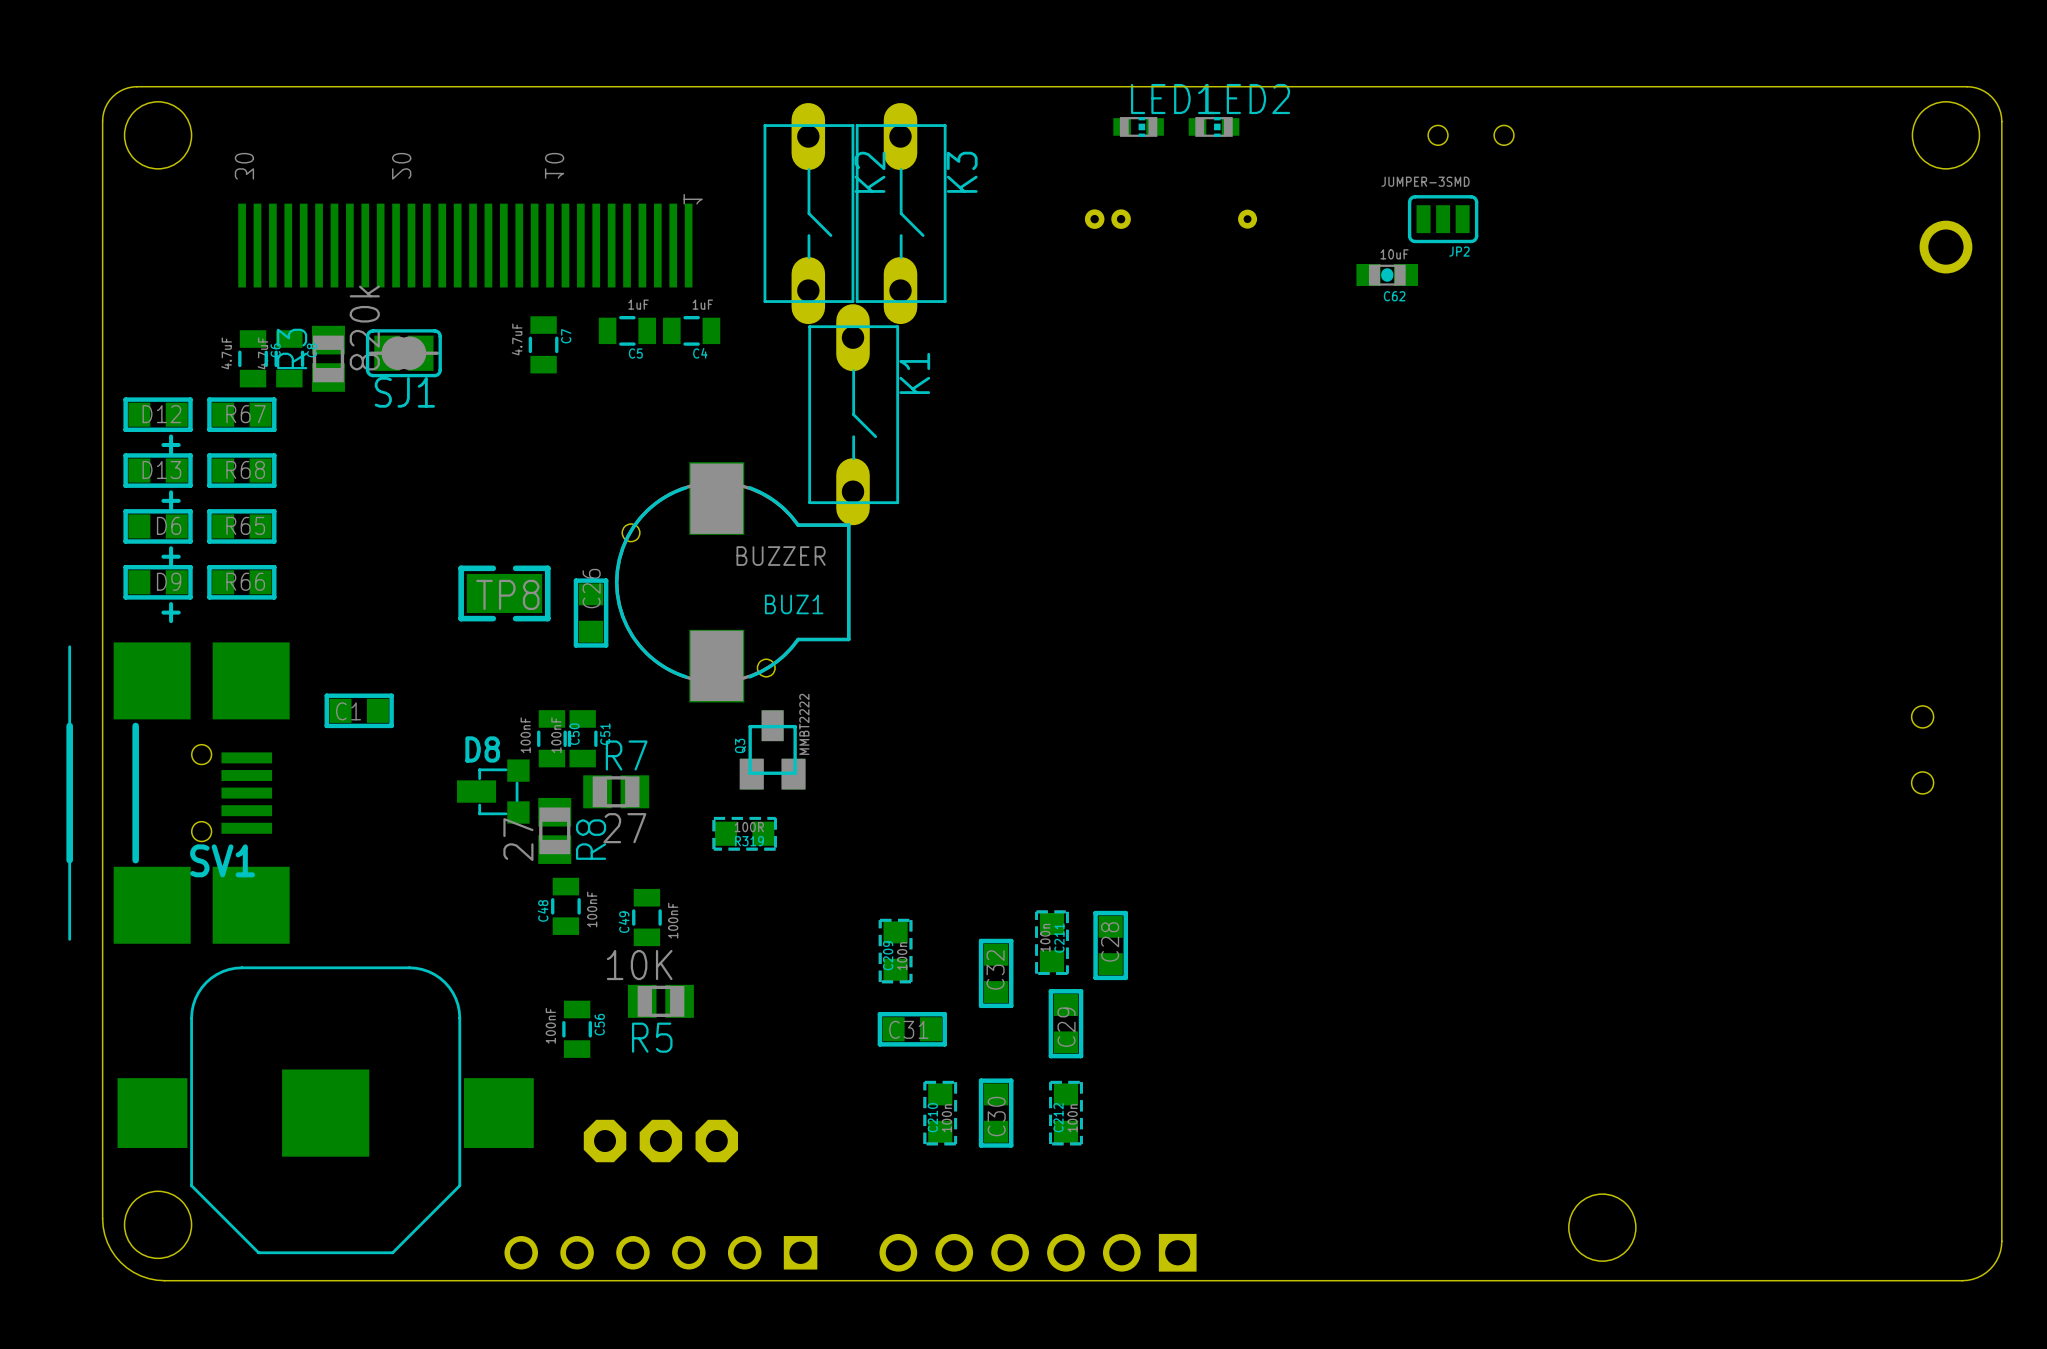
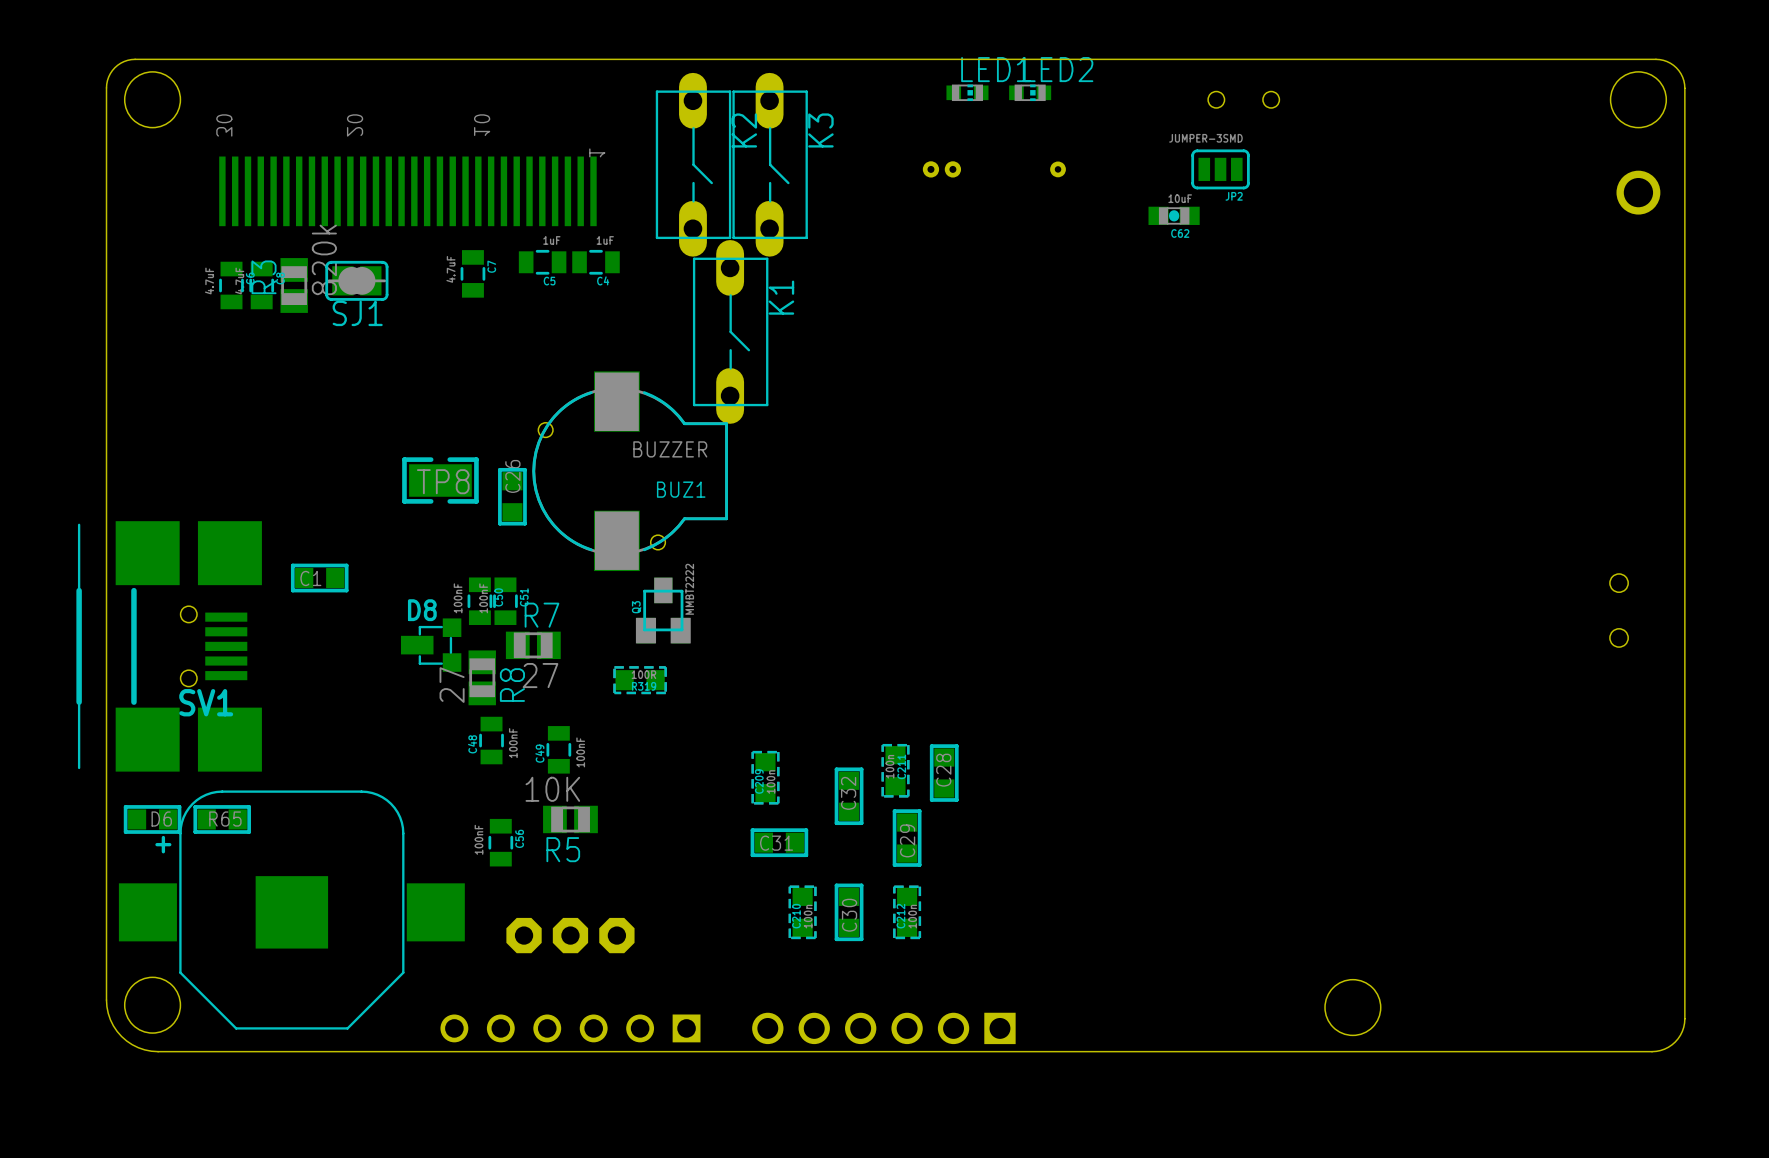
D12: (158, 414) -> none
R67: (241, 414) -> none
D13: (158, 470) -> none
R68: (241, 470) -> none
D6 position: (158, 526) -> (152, 819)
R65 position: (241, 526) -> (222, 819)
D9: (158, 582) -> none
R66: (241, 582) -> none

